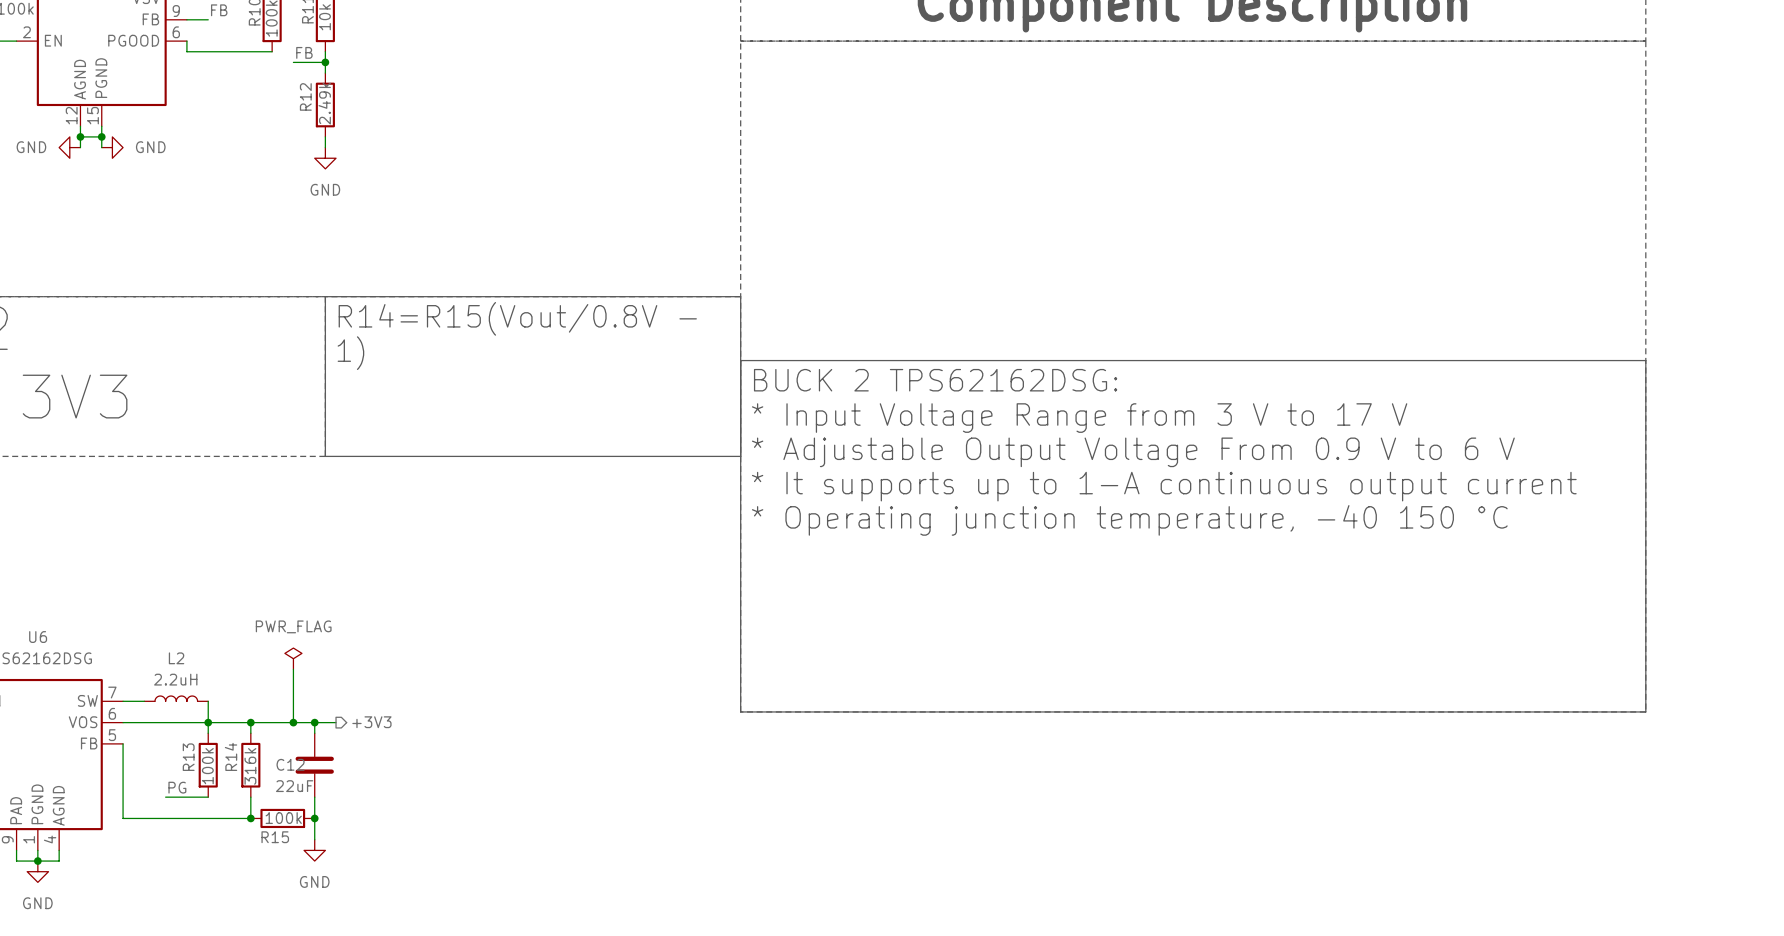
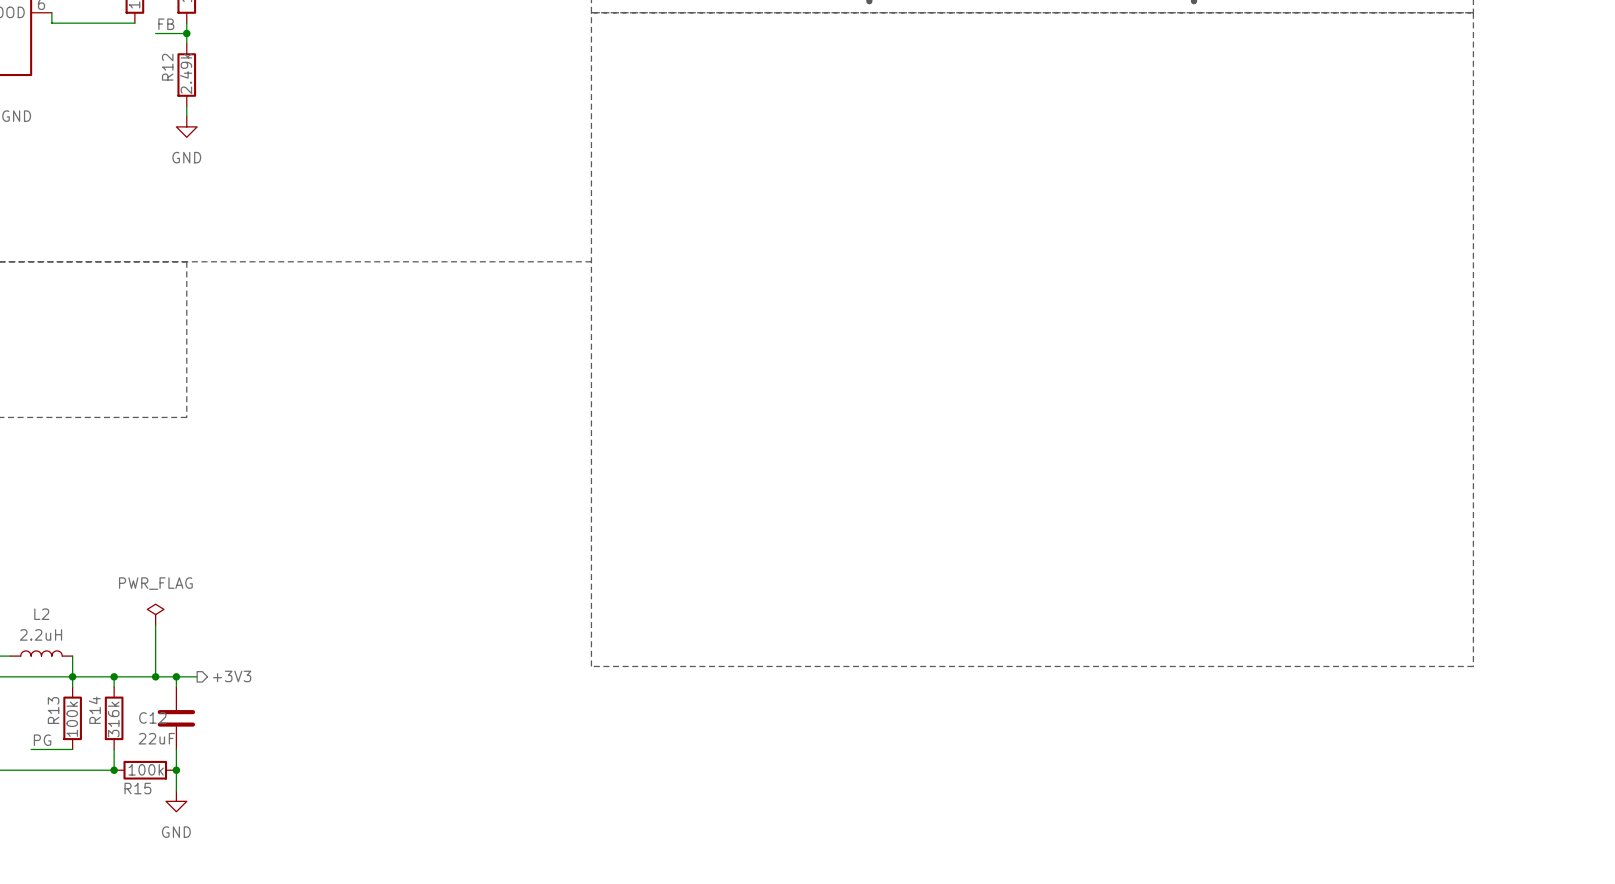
text: R14=R15(Vout/0.8V - (517, 318) -> none
text: 1) (350, 353) -> none
line: (740, 360) (1645, 360) (1645, 711) (740, 711) (740, 296) (325, 296) (325, 456) (740, 456) -> none
text: BUCK 2 TPS62162DSG: (935, 380) -> none
text: * Input Voltage Range from 3 V to 17 V (1079, 418) -> none
text: * Adjustable Output Voltage From 0.9 V to 6 V (1133, 452) -> none
text: * It supports up to 1-A continuous output current (1164, 486) -> none
text: * Operating junction temperature, -40 150 °C (1129, 520) -> none

